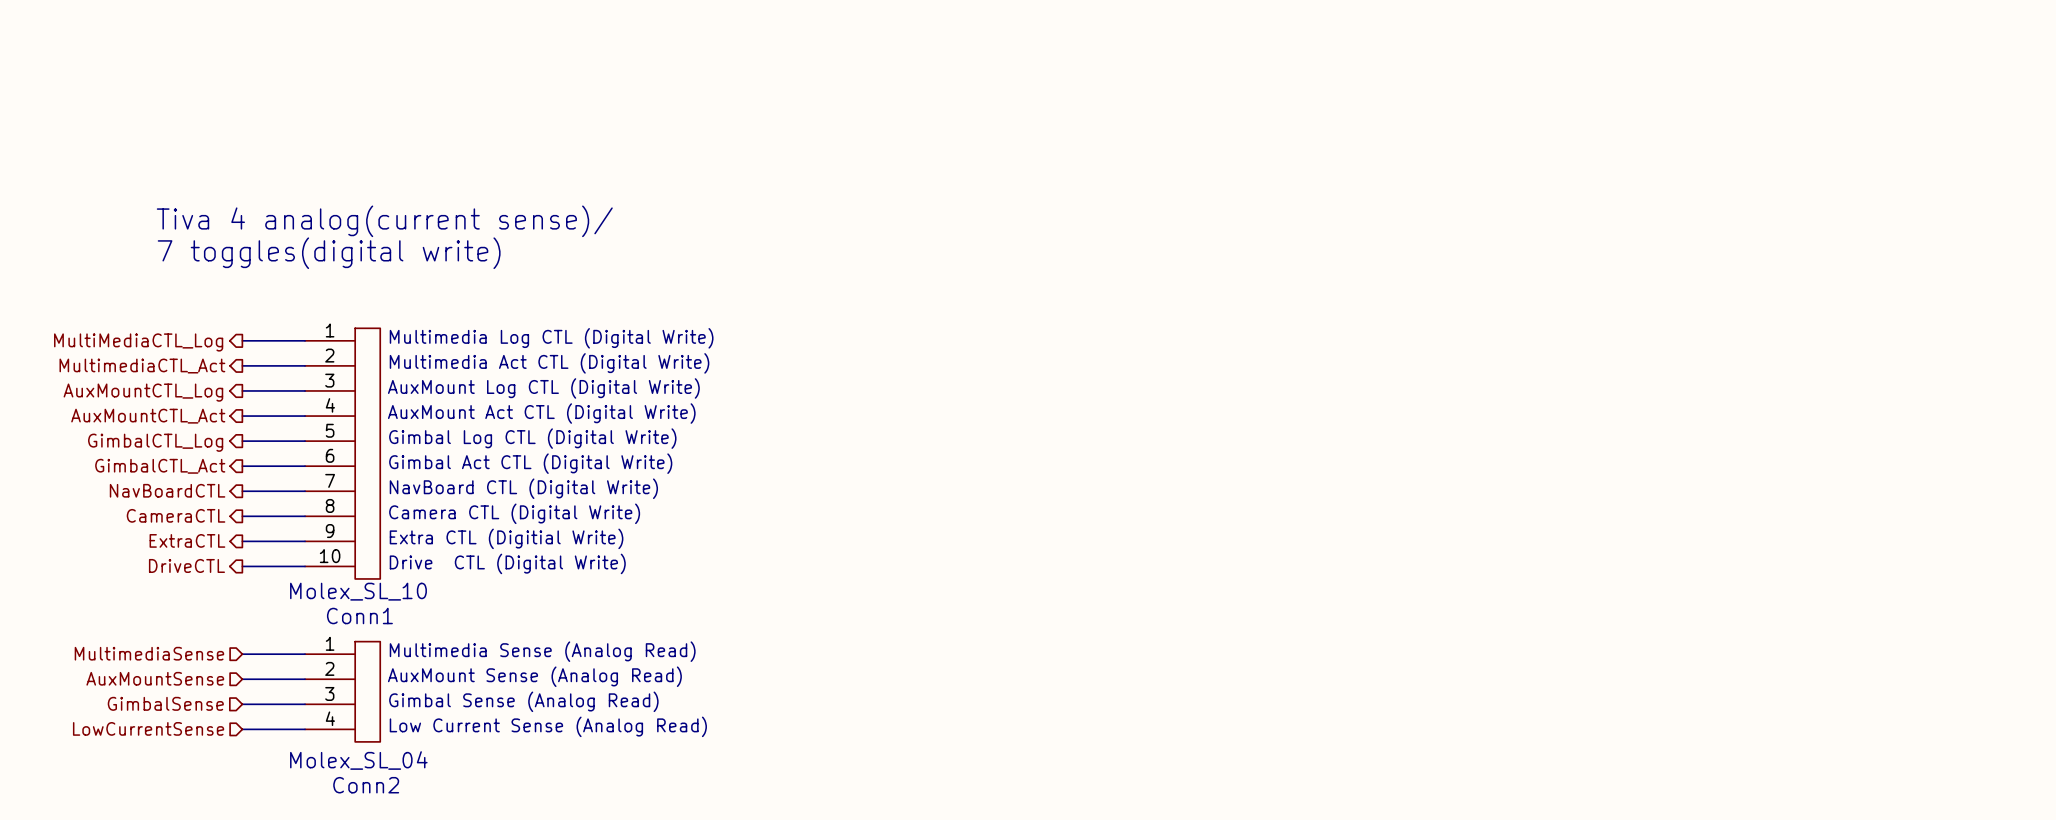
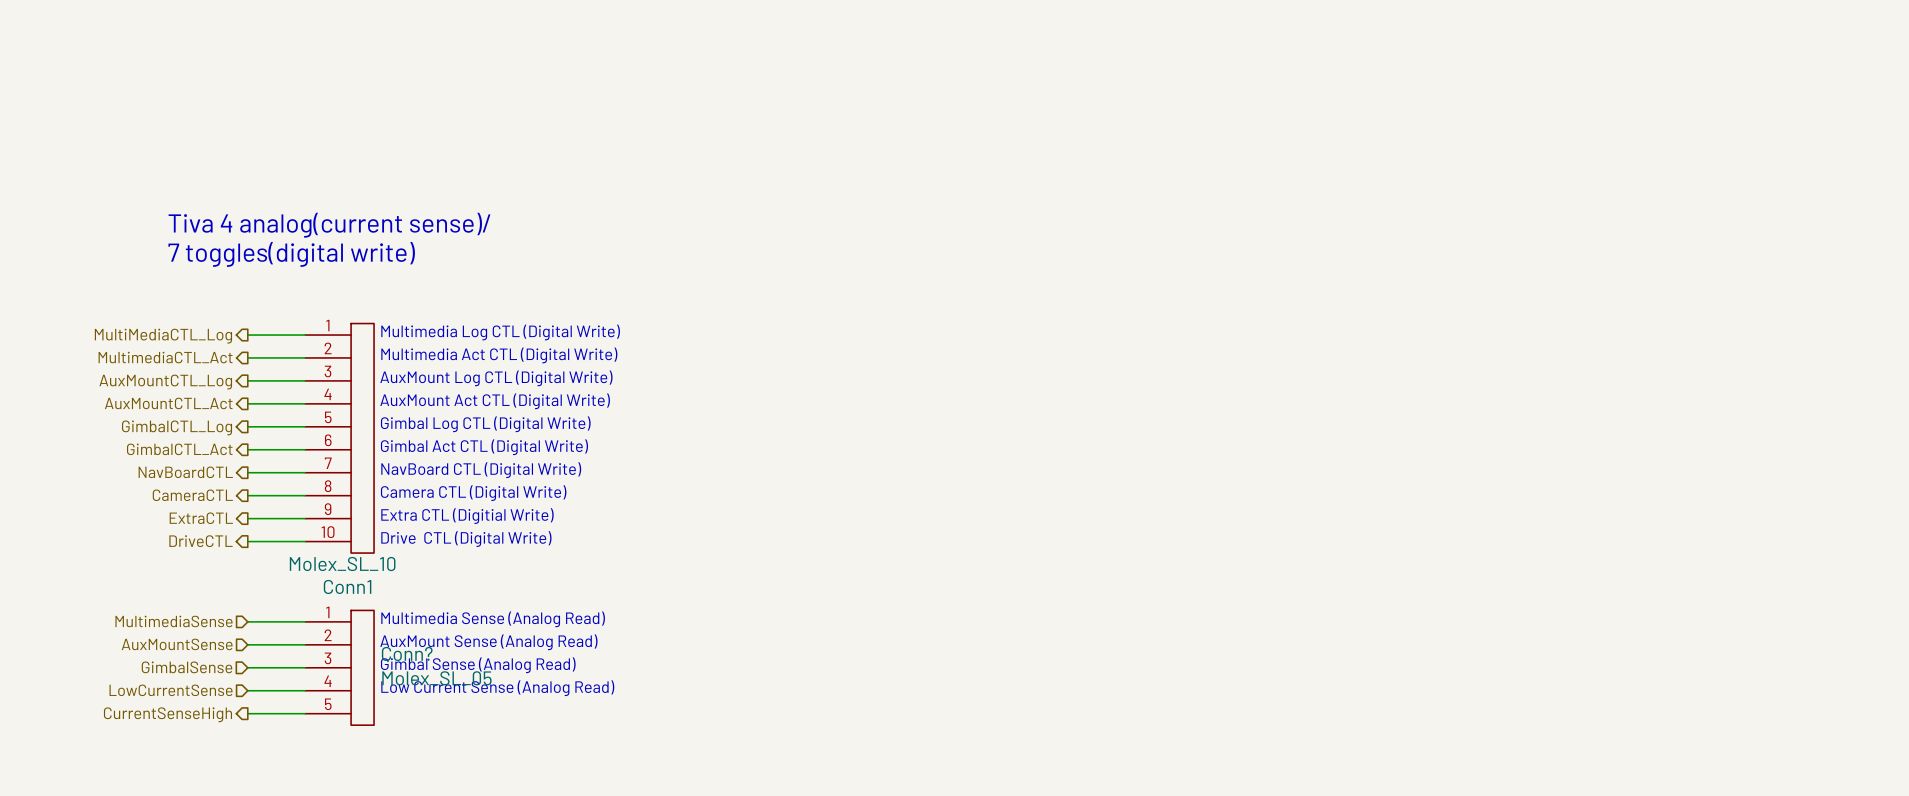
Conn2: Molex_SL_04 (342, 691) -> none
Conn?: none -> Molex_SL_05 (339, 667)
wire: none -> (247, 713) (305, 713)
hierarchical label: none -> CurrentSenseHigh (167, 714)

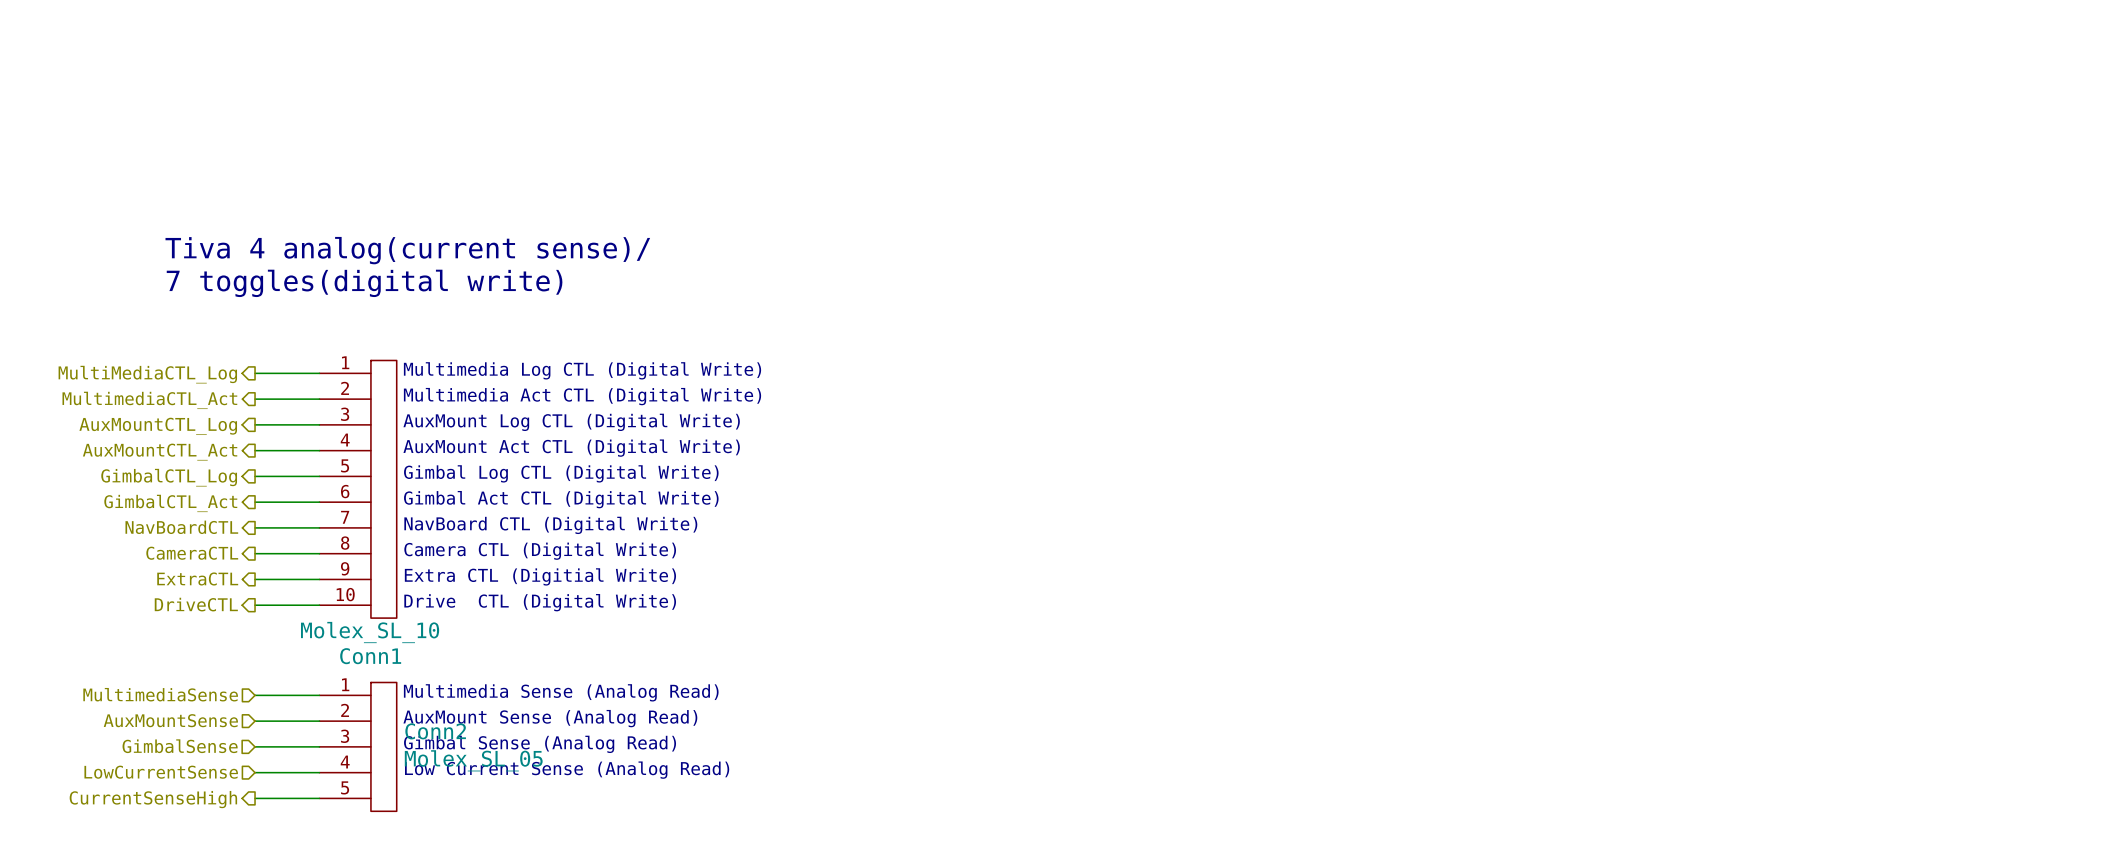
Conn? name: Conn? (407, 653) -> Conn2 (435, 731)

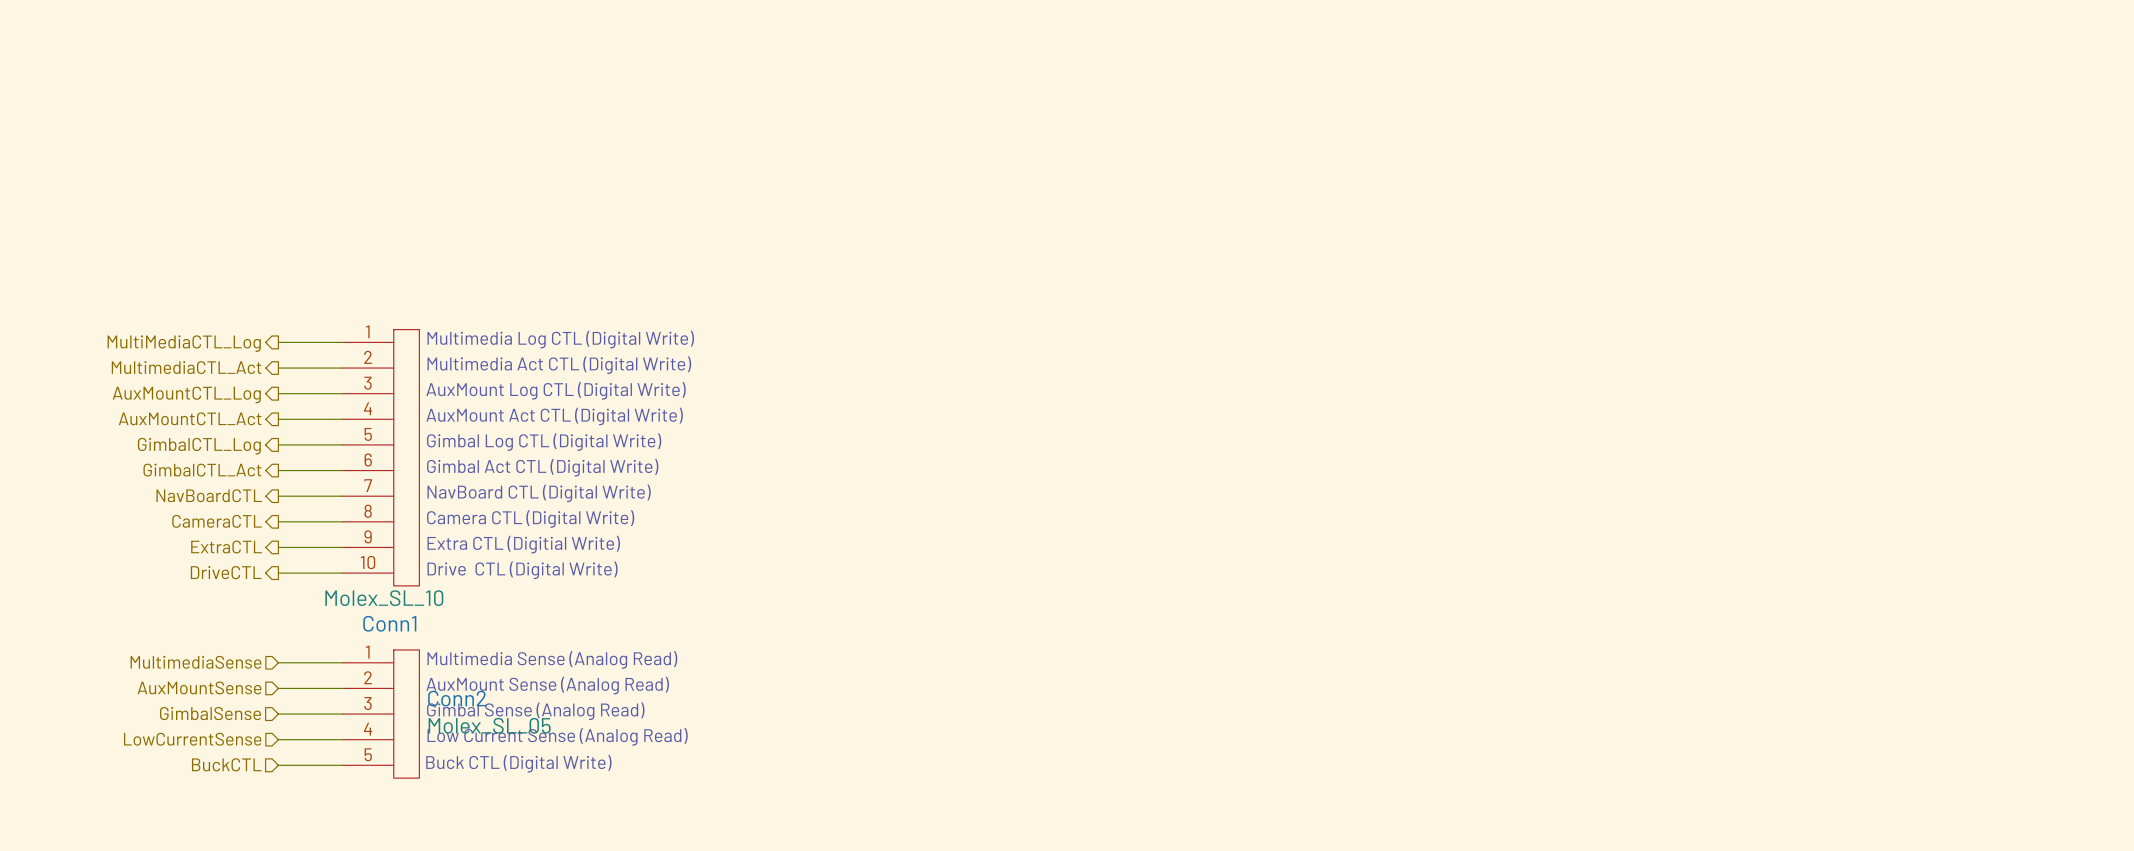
text: Tiva 4 analog(current sense)/ (407, 250) -> none
text: 7 toggles(digital write) (364, 283) -> none
text: none -> Buck CTL (Digital Write) (518, 763)
hierarchical label shape: output (153, 799) -> input (226, 764)
hierarchical label: CurrentSenseHigh (153, 799) -> BuckCTL (226, 764)

